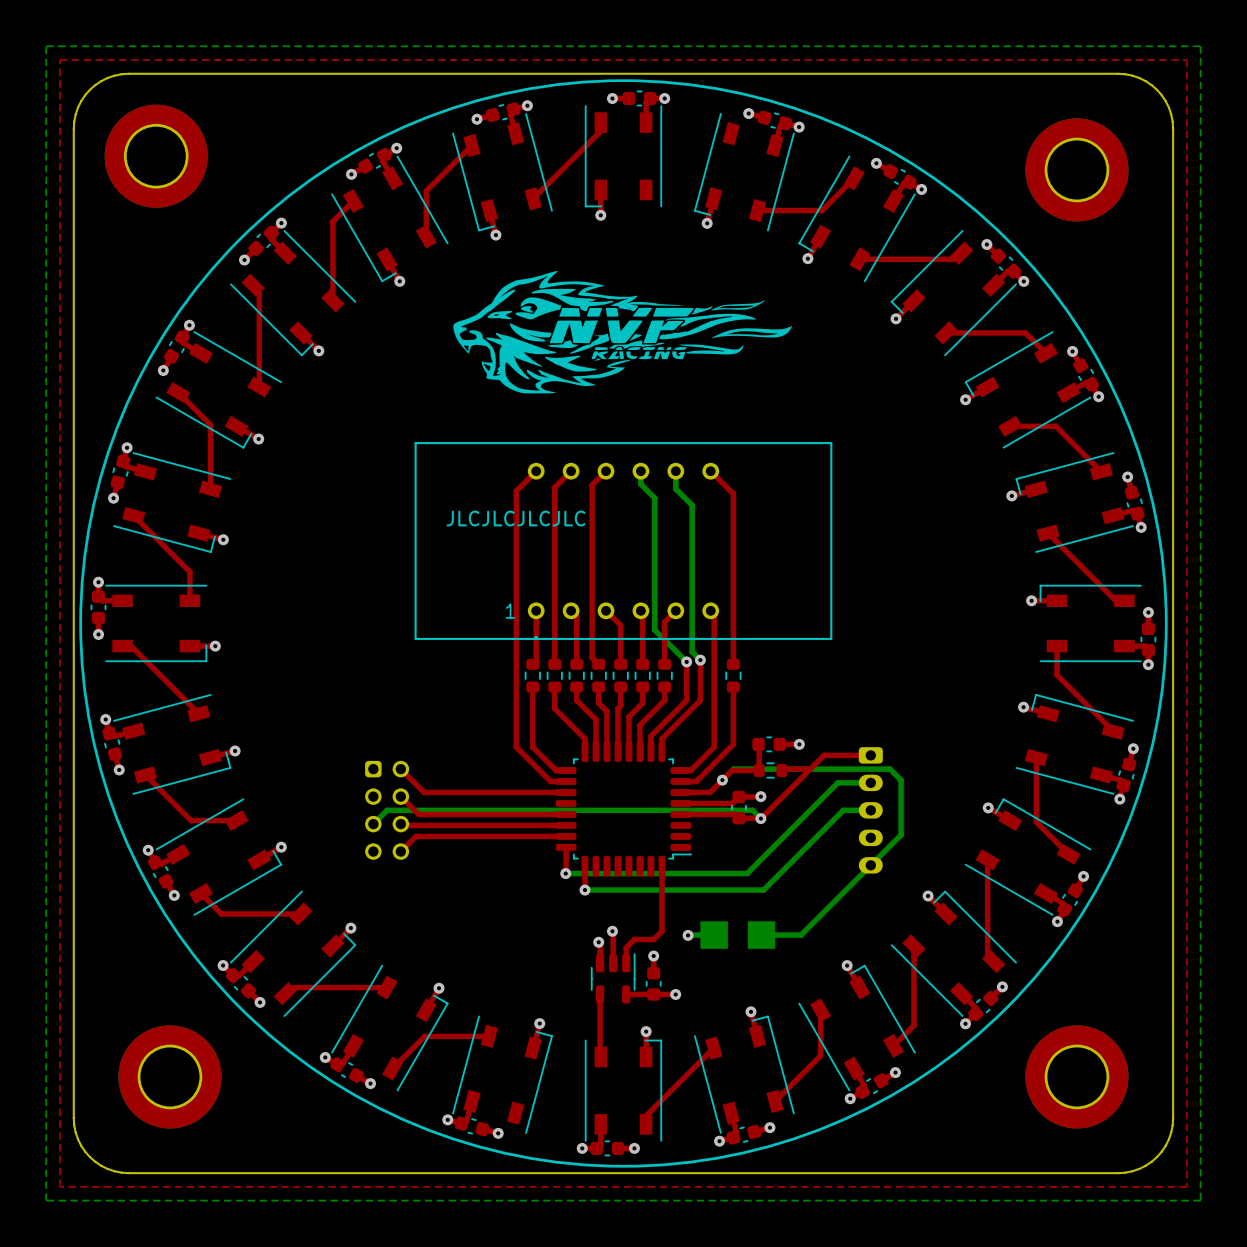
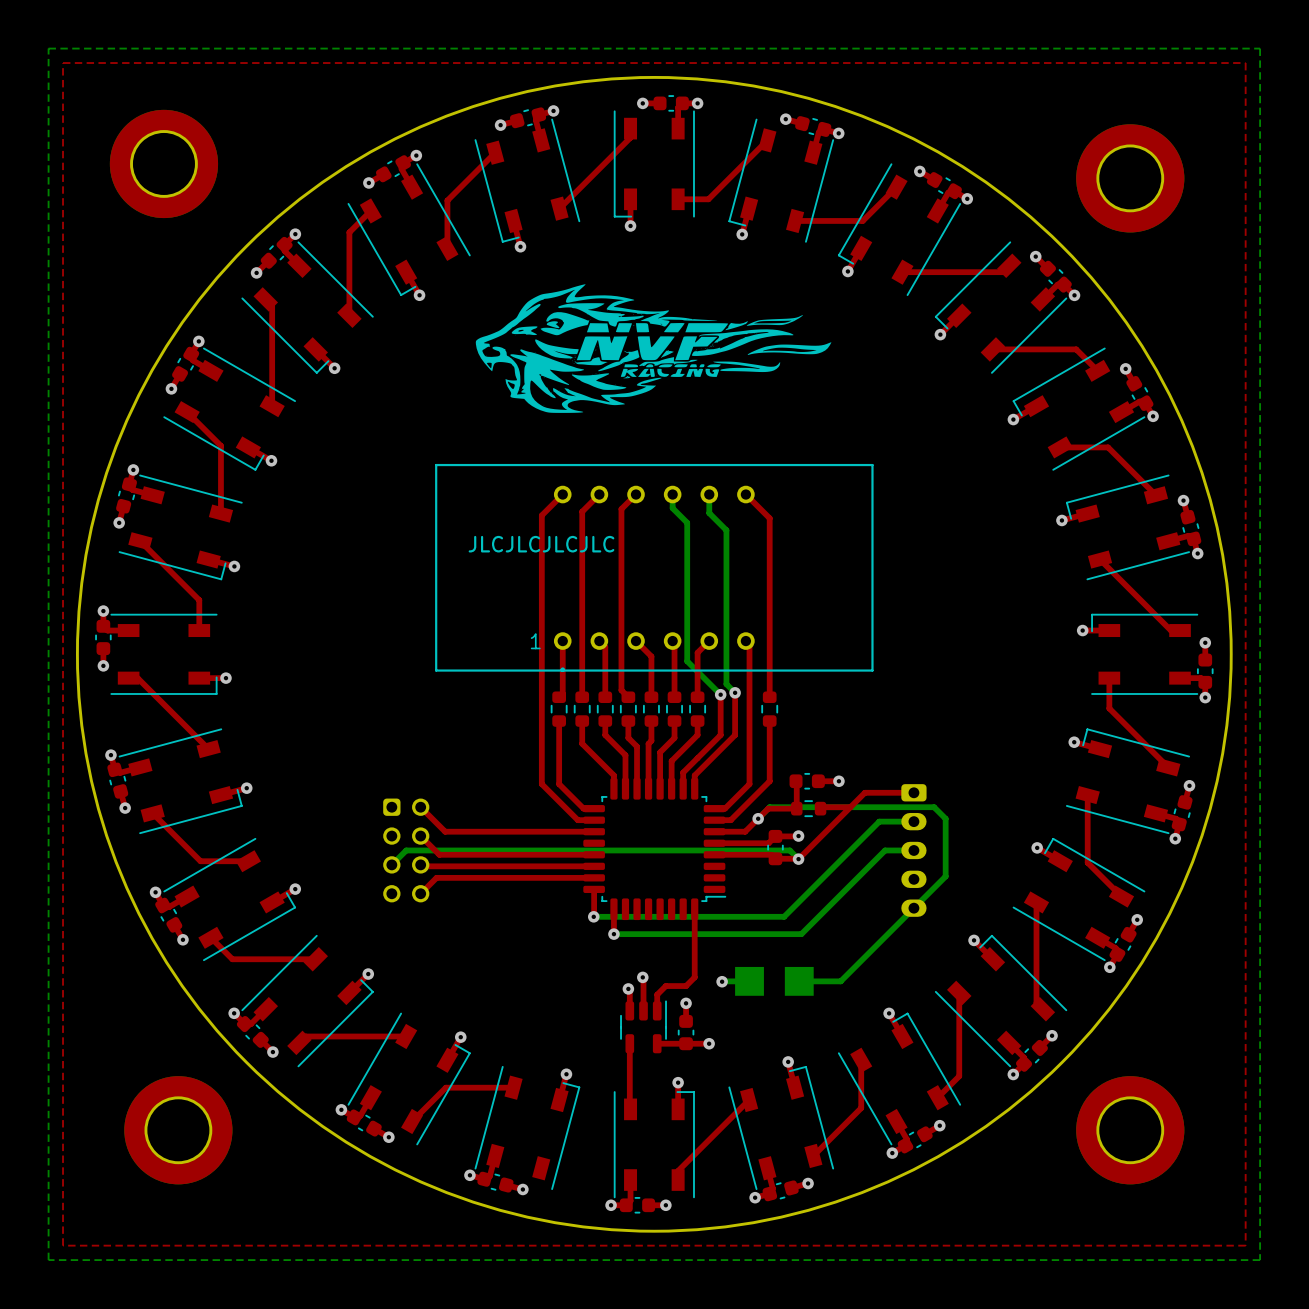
round board edge: none -> [75, 75, 1233, 1233]
board edge: (128, 73) (1118, 73) (1139, 77) (1157, 89) (1168, 107) (1173, 128) (1173, 1118) (1168, 1139) (1157, 1157) (1139, 1168) (1118, 1173) (128, 1173) (107, 1168) (89, 1157) (77, 1139) (73, 1118) (73, 128) (77, 107) (89, 89) (107, 77) (128, 73) -> none
drawing: [79, 79, 1168, 1168] -> none
top track: none -> (767, 140) (708, 199) (678, 199)

